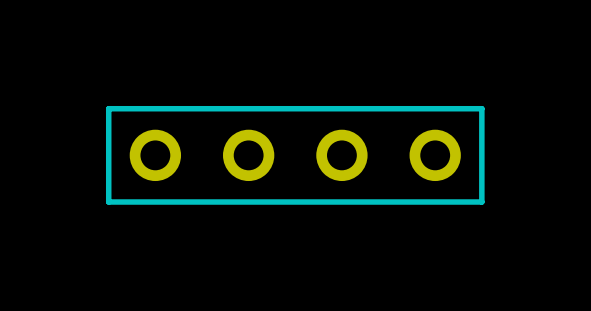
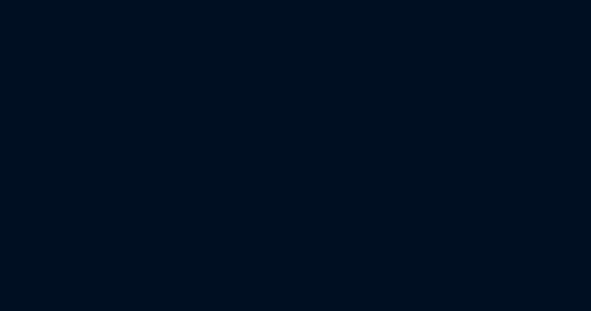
part: (295, 155) -> none

